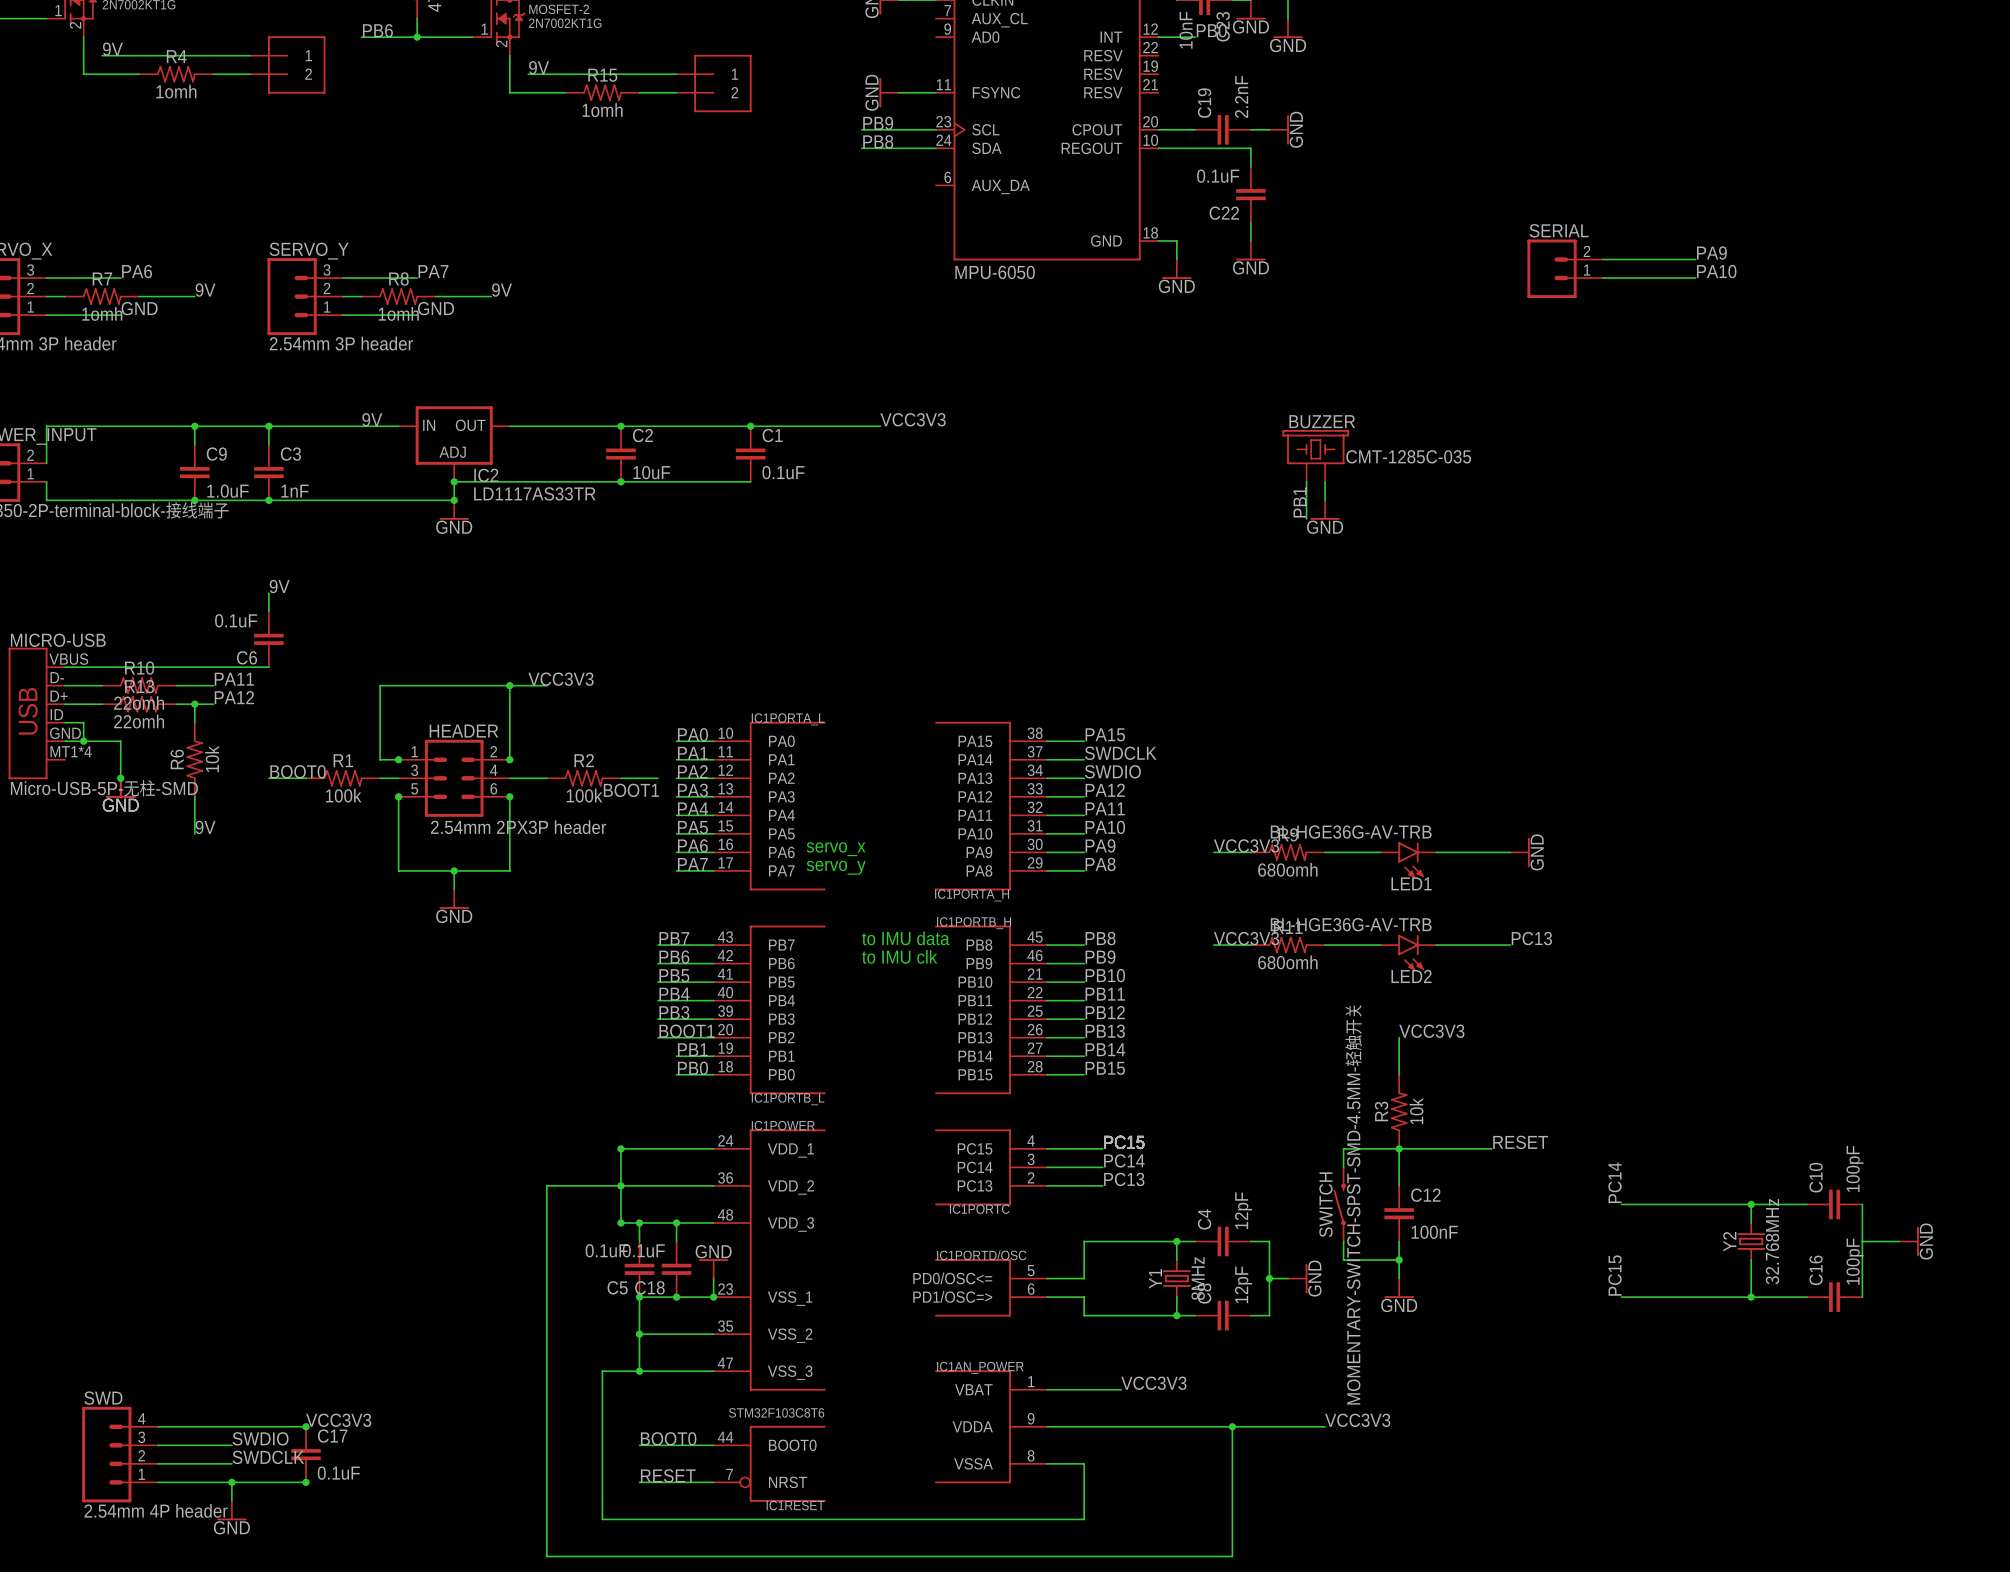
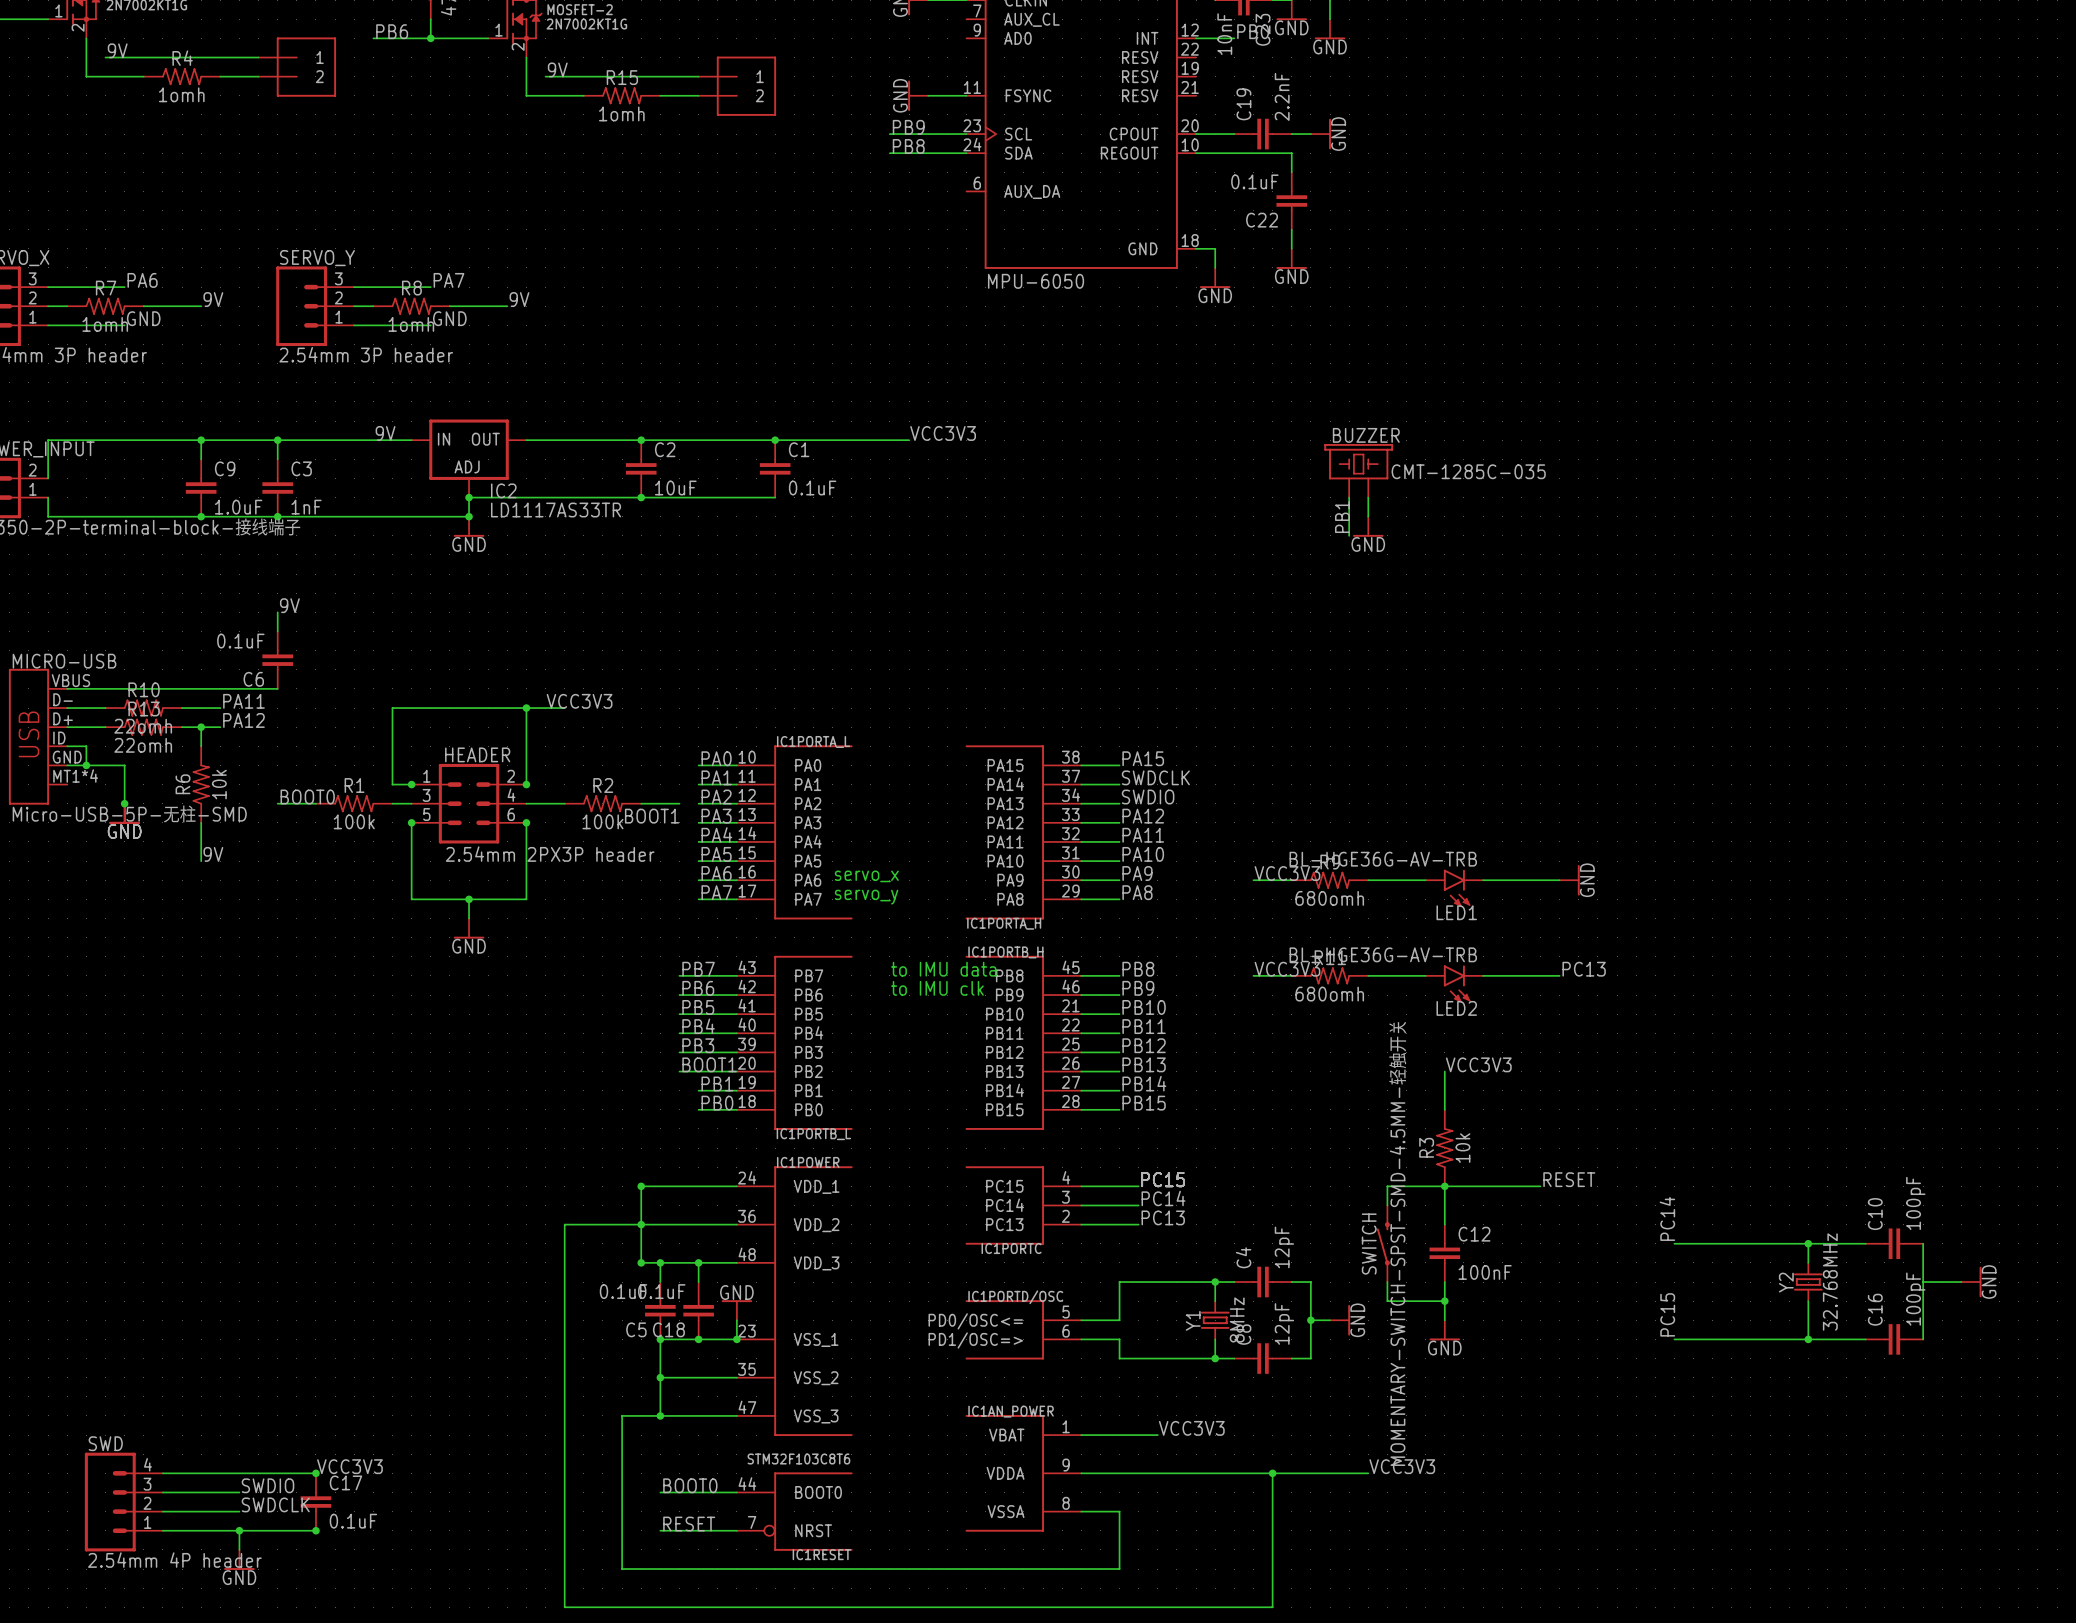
label: PA9 (1711, 253) -> none
wire: (1602, 259) (1695, 259) -> none
SERIAL: (1565, 268) -> none
label: PA10 (1716, 271) -> none
wire: (1602, 278) (1695, 278) -> none

